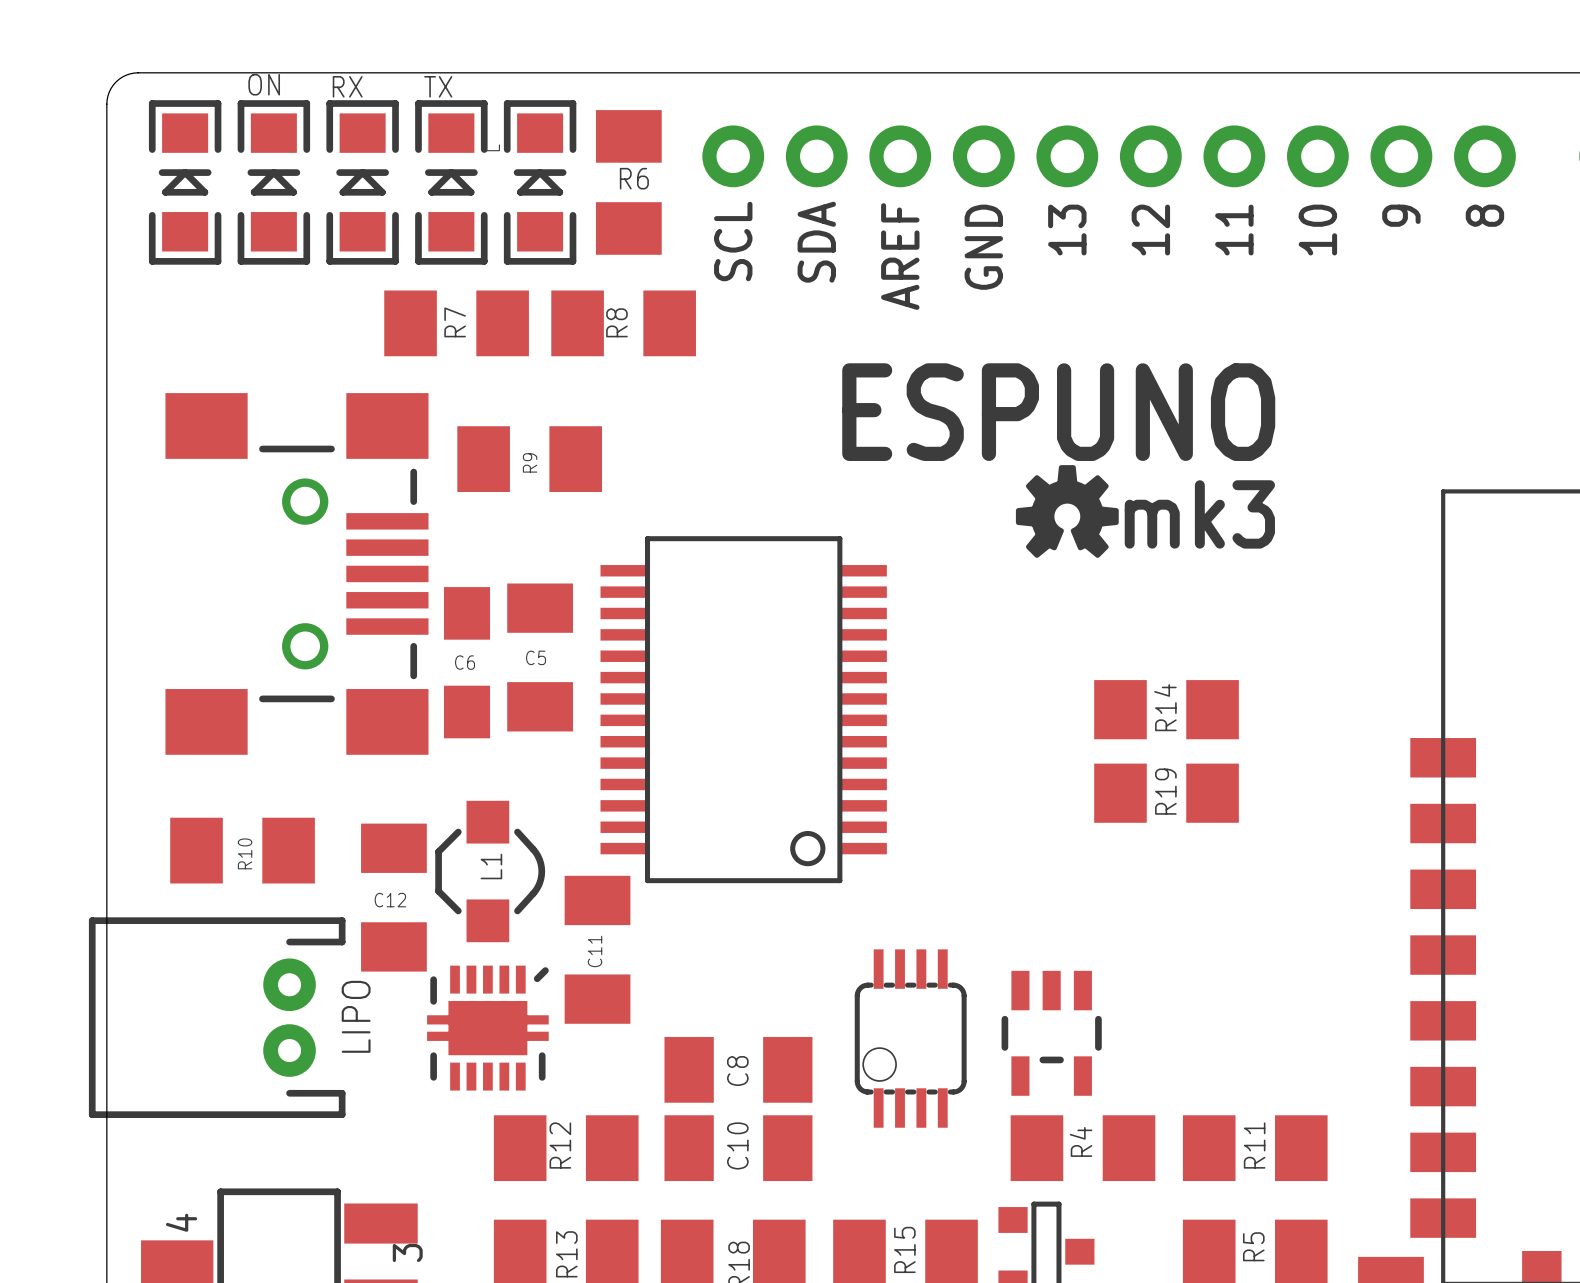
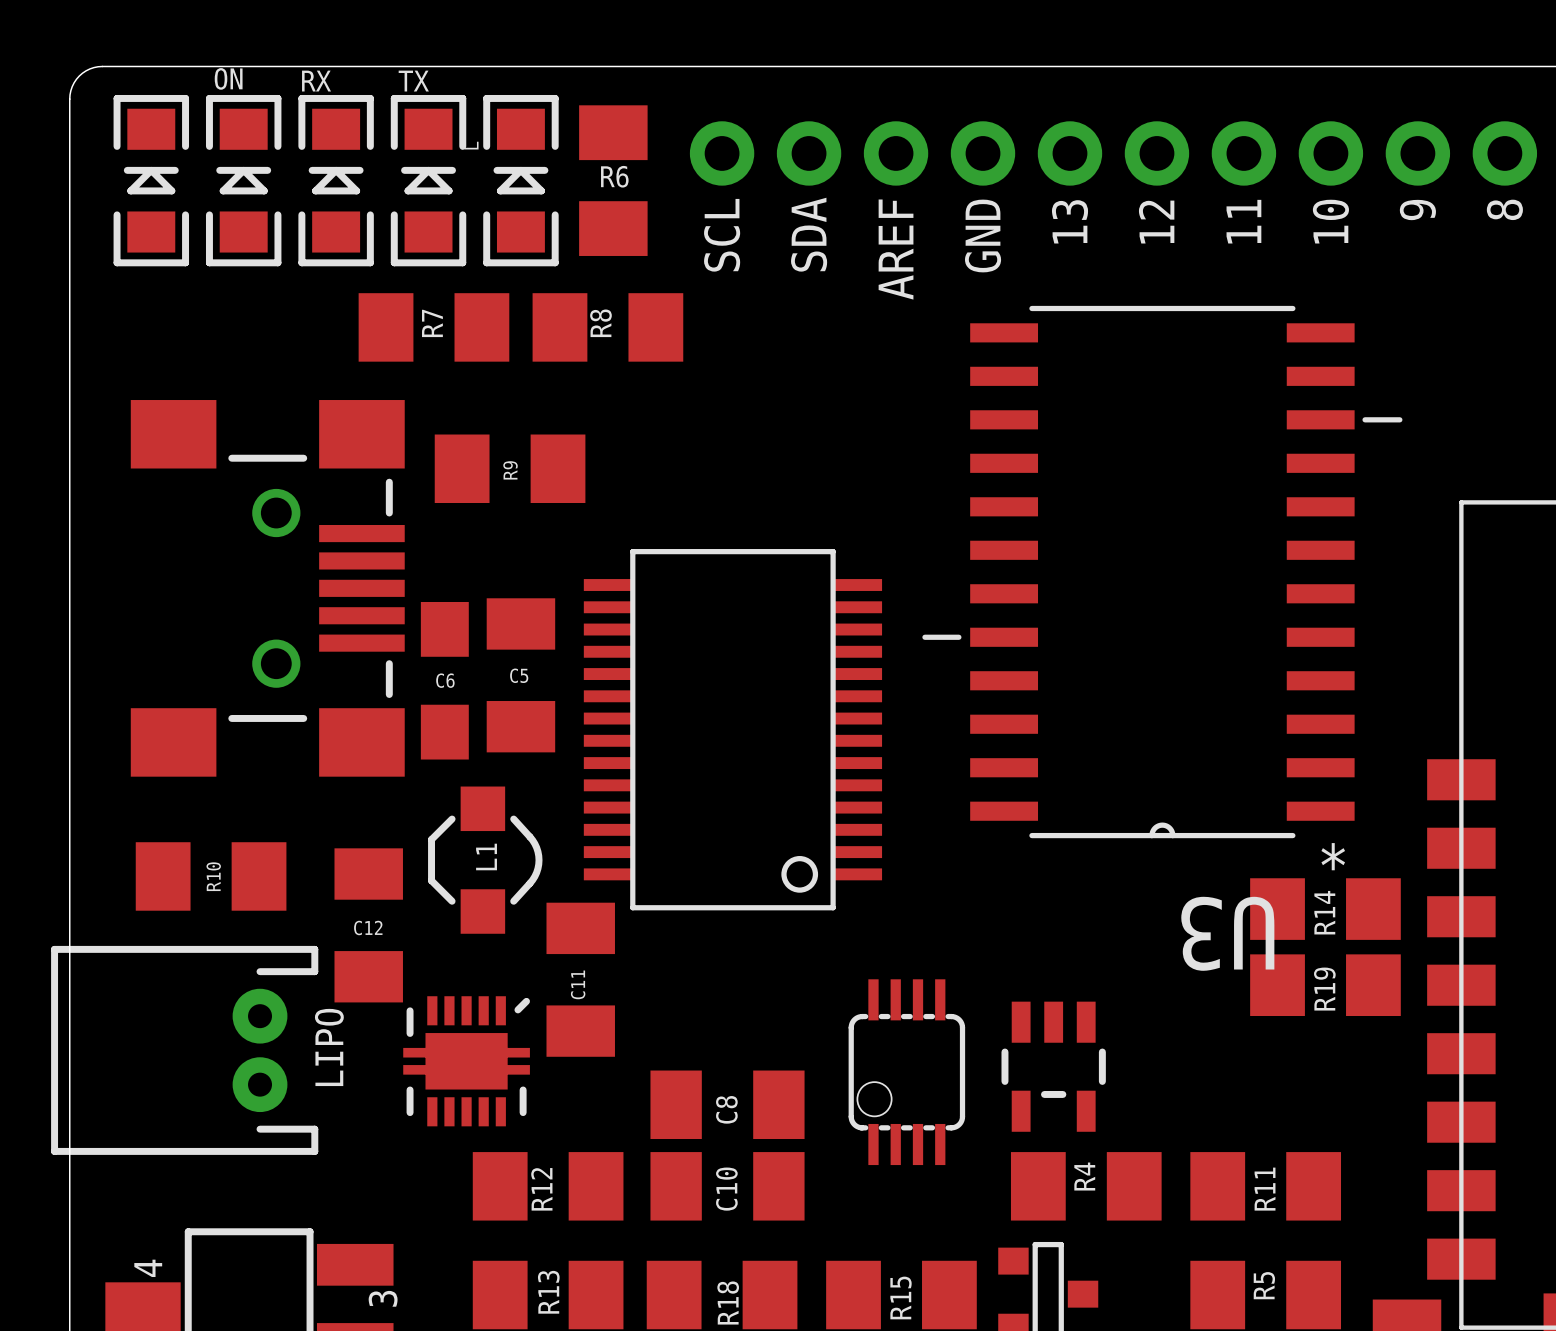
text: ESPUNO (1058, 412) -> none
drawing: [1015, 465, 1119, 558] -> none
text: mk3 (1199, 514) -> none
U3: none -> (1162, 572)
R14 position: (1166, 709) -> (1325, 909)
R19 position: (1166, 793) -> (1325, 985)
L1 position: (490, 871) -> (485, 860)

